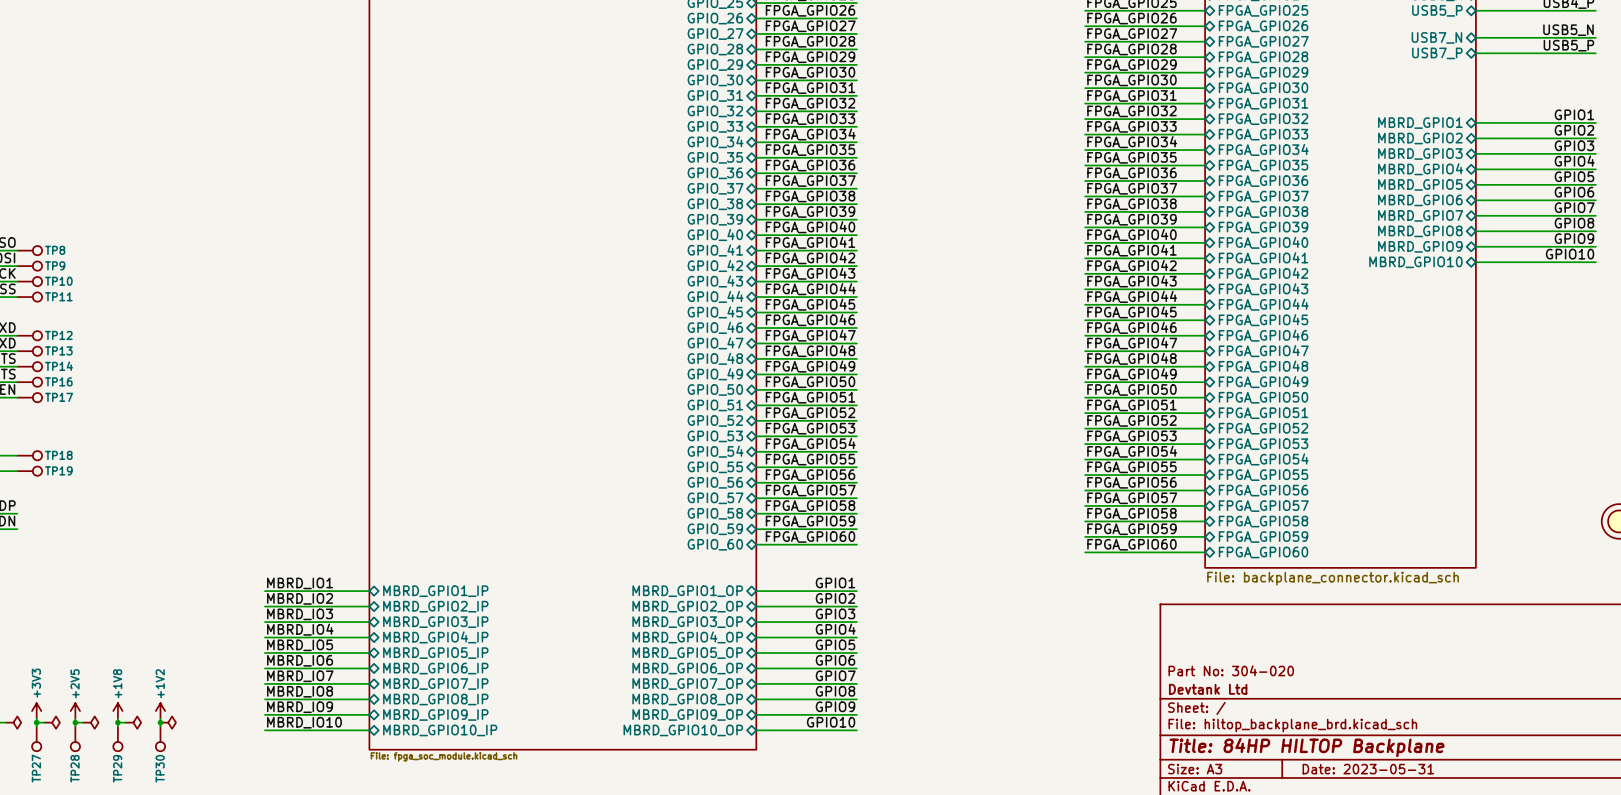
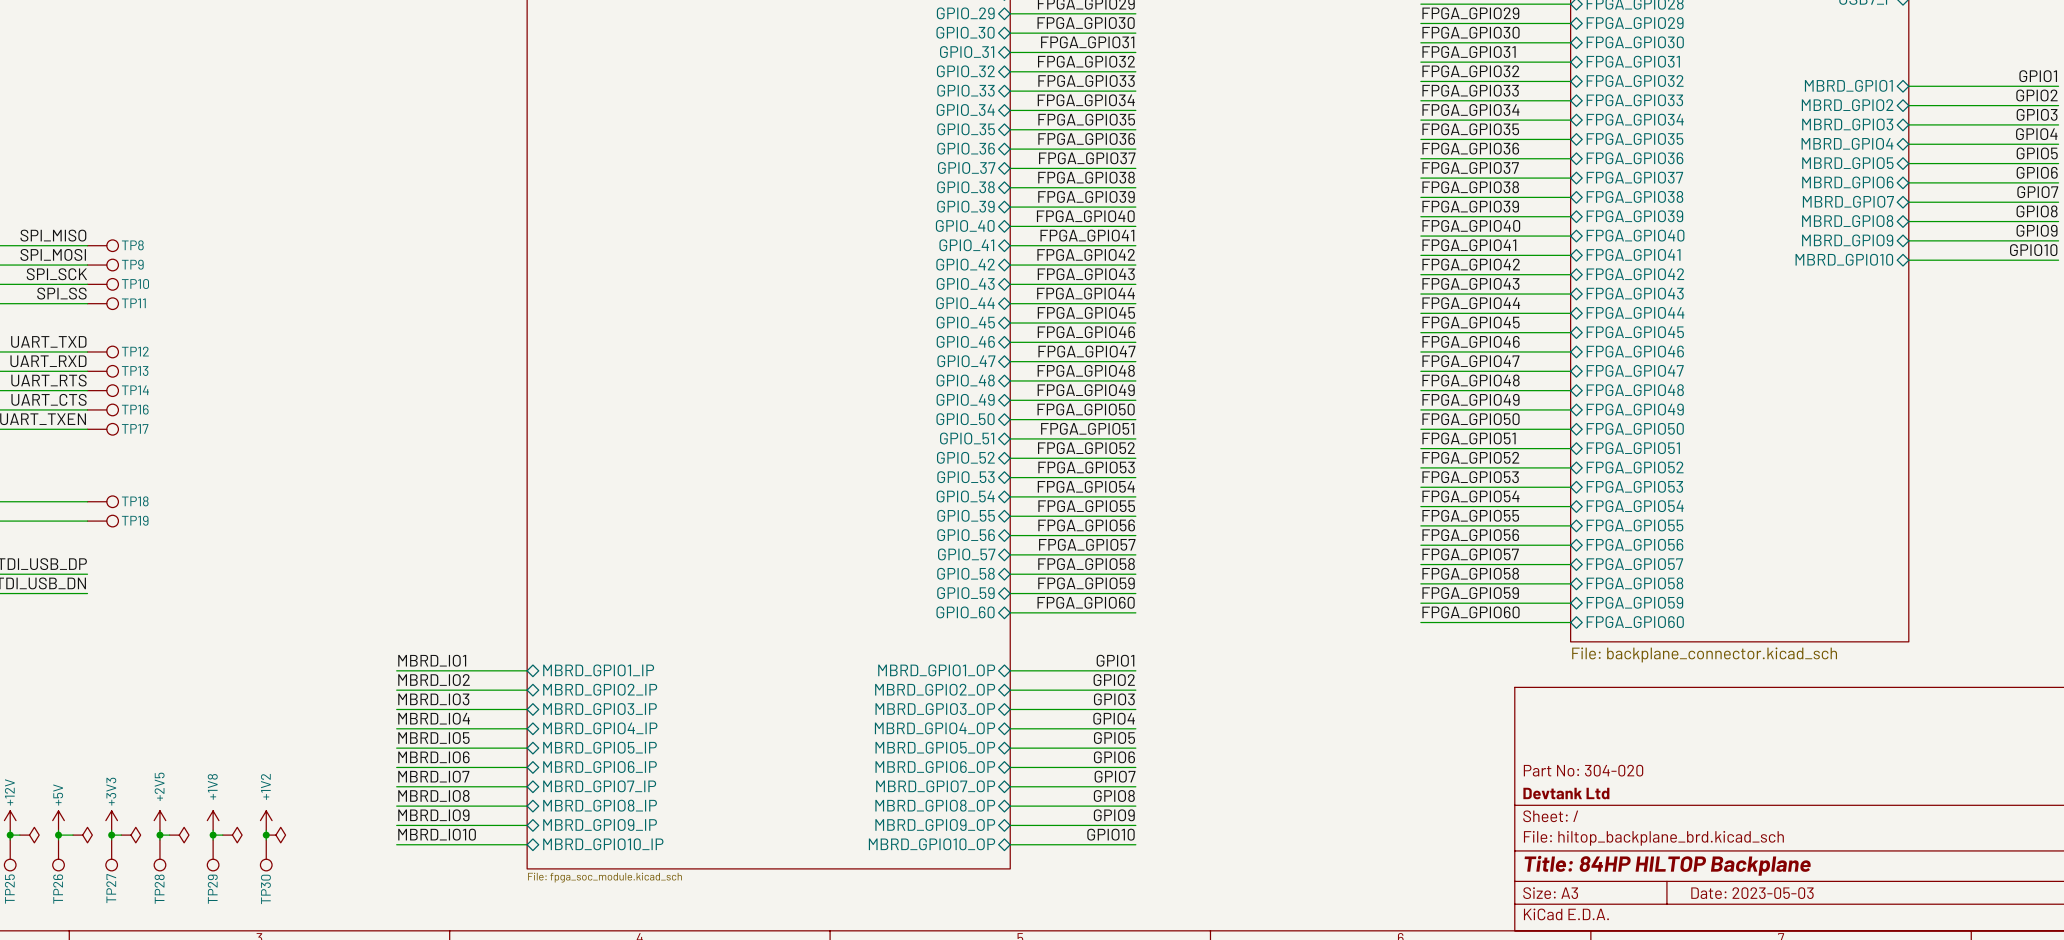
title block: Date: 2023-05-31 (1368, 769) -> Date: 2023-05-03 (1752, 893)

